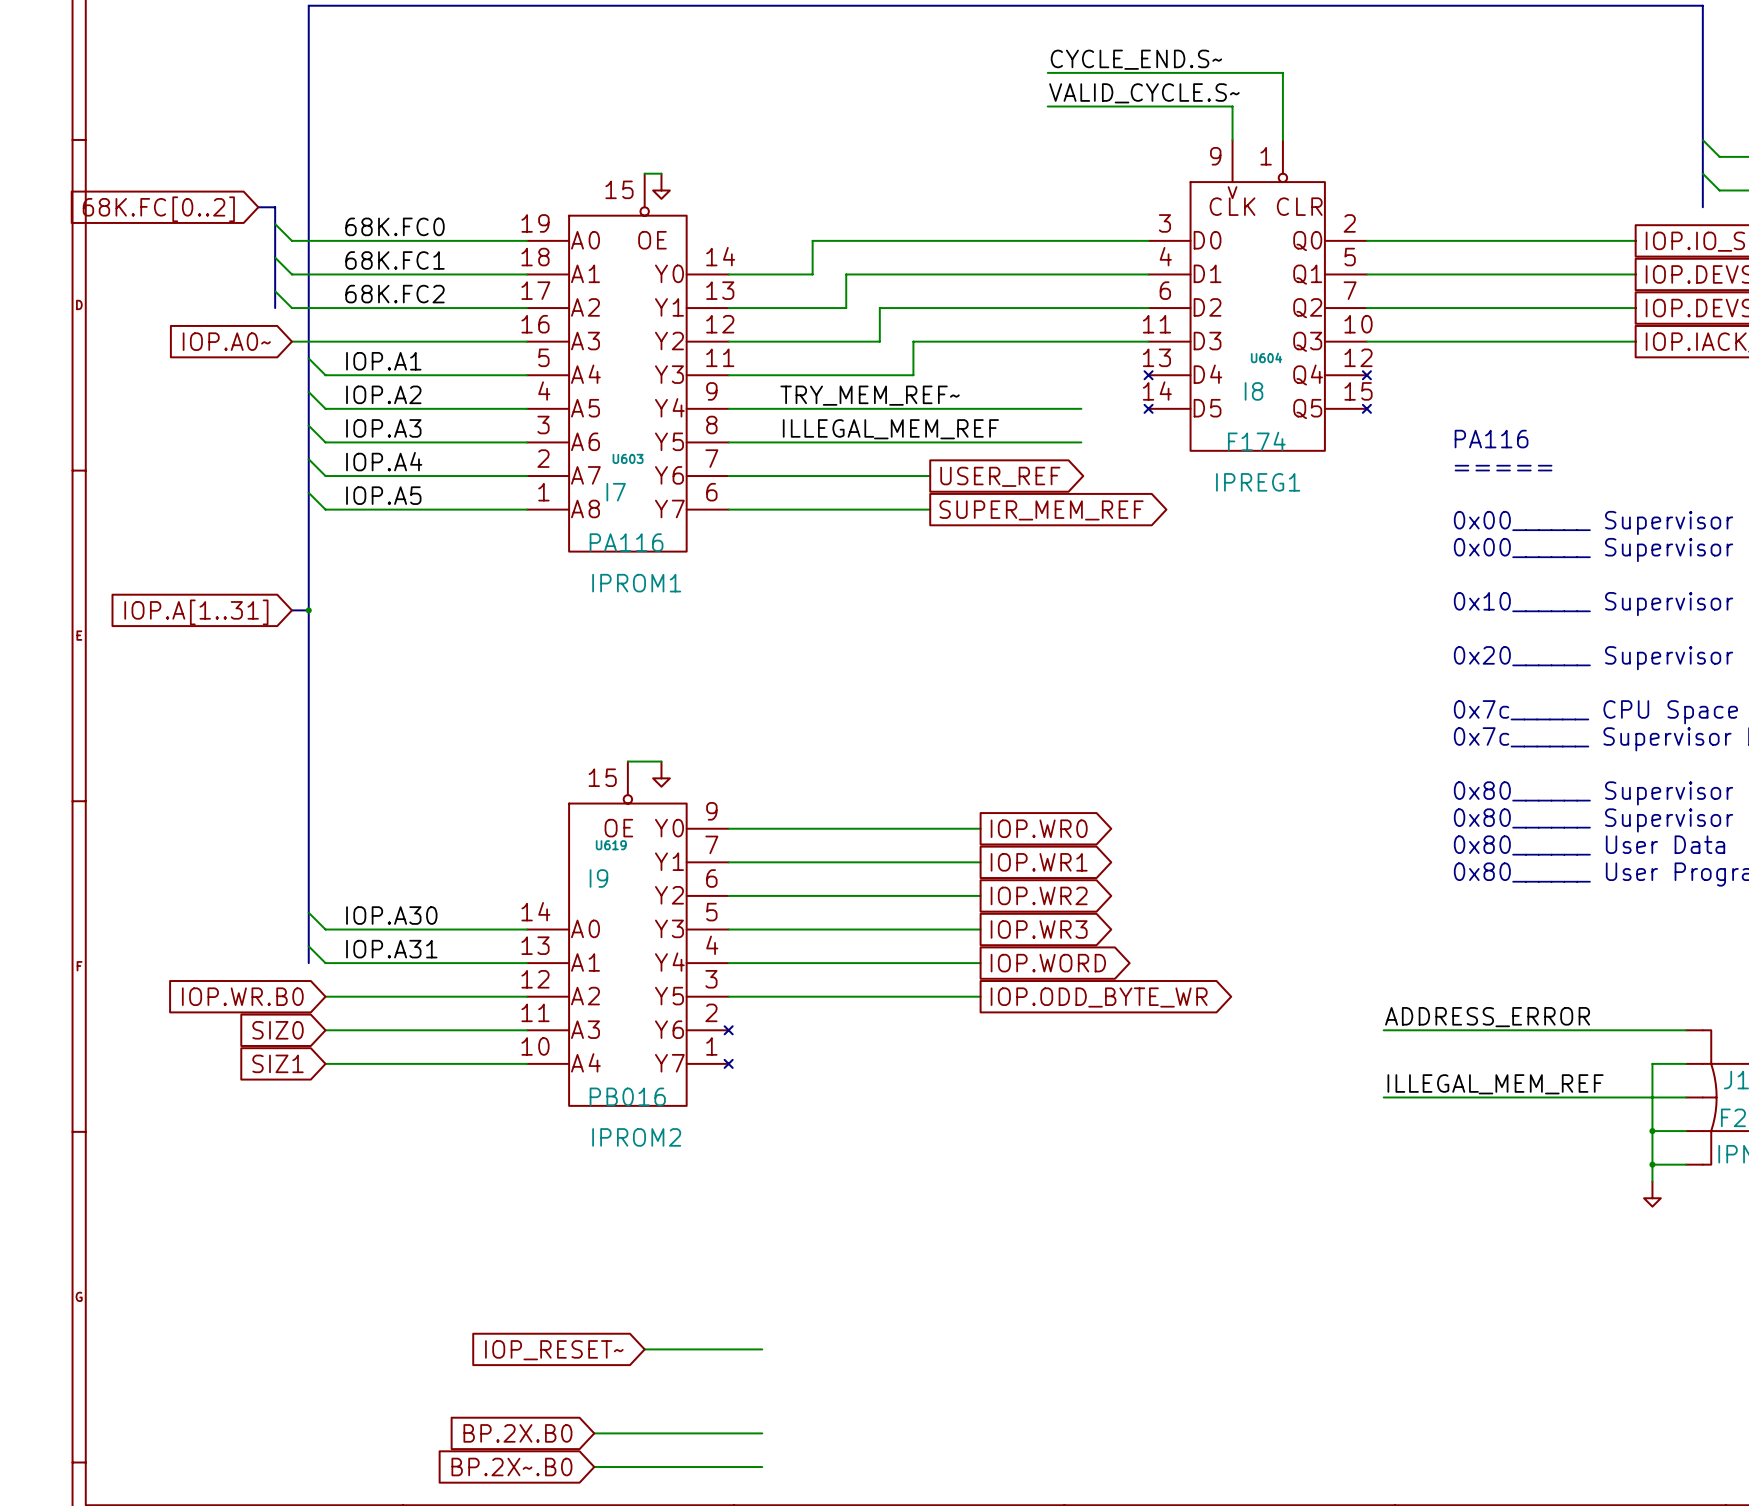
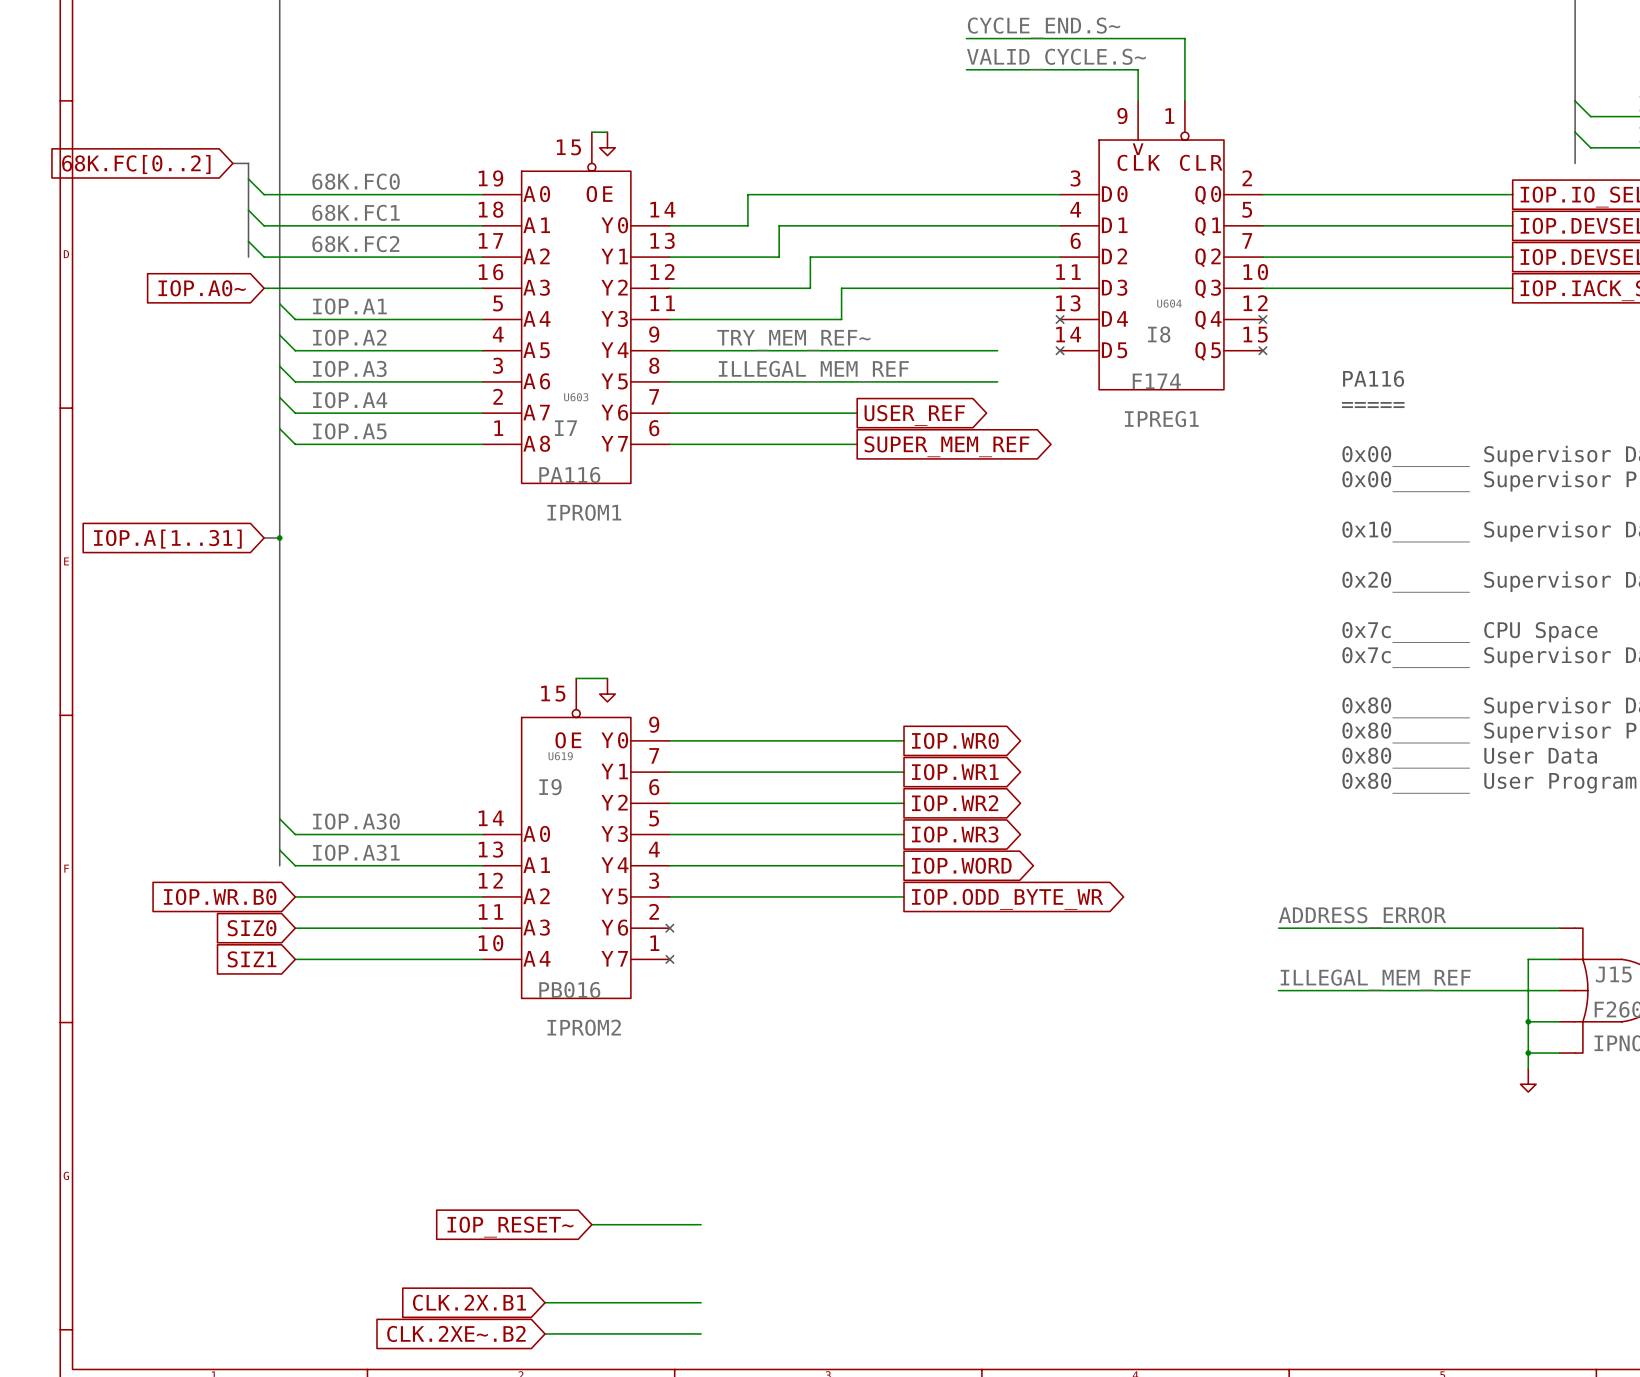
global label: BP.2X.B0 (517, 1433) -> CLK.2X.B1 (469, 1302)
global label: BP.2X~.B0 (511, 1466) -> CLK.2XE~.B2 (456, 1333)

